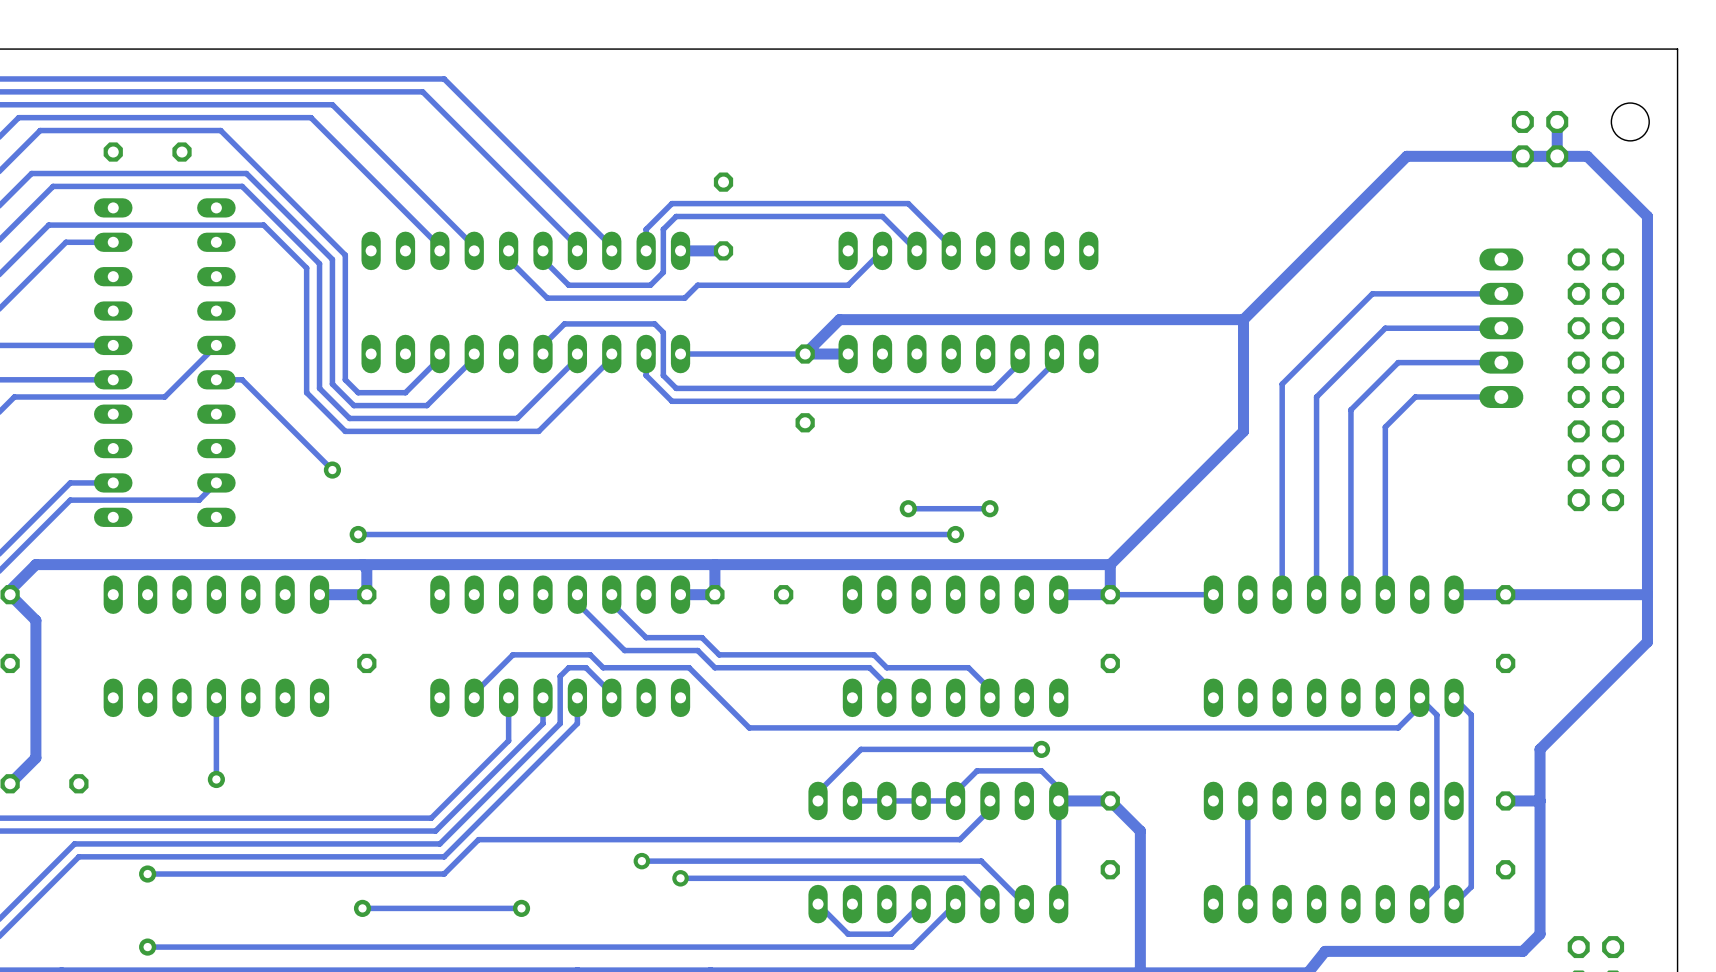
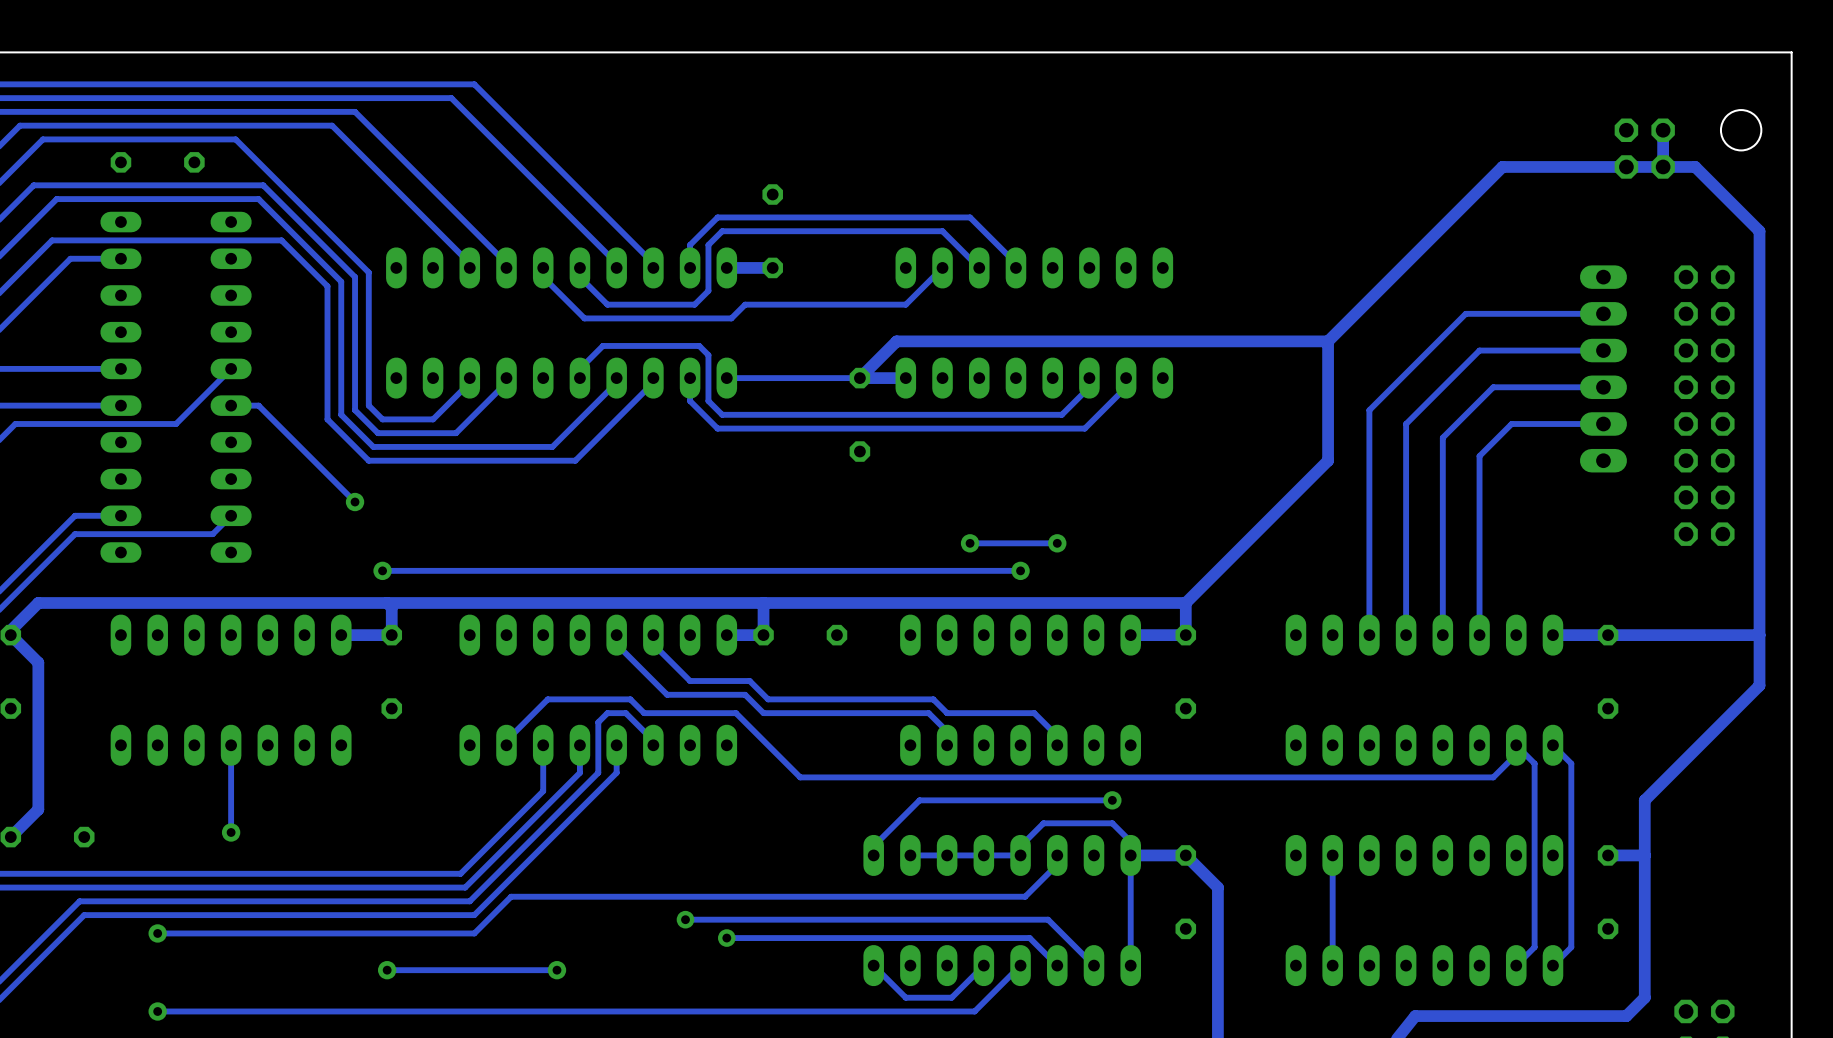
part: none -> (1603, 368)
track: (1213, 594) (1110, 594) -> none

